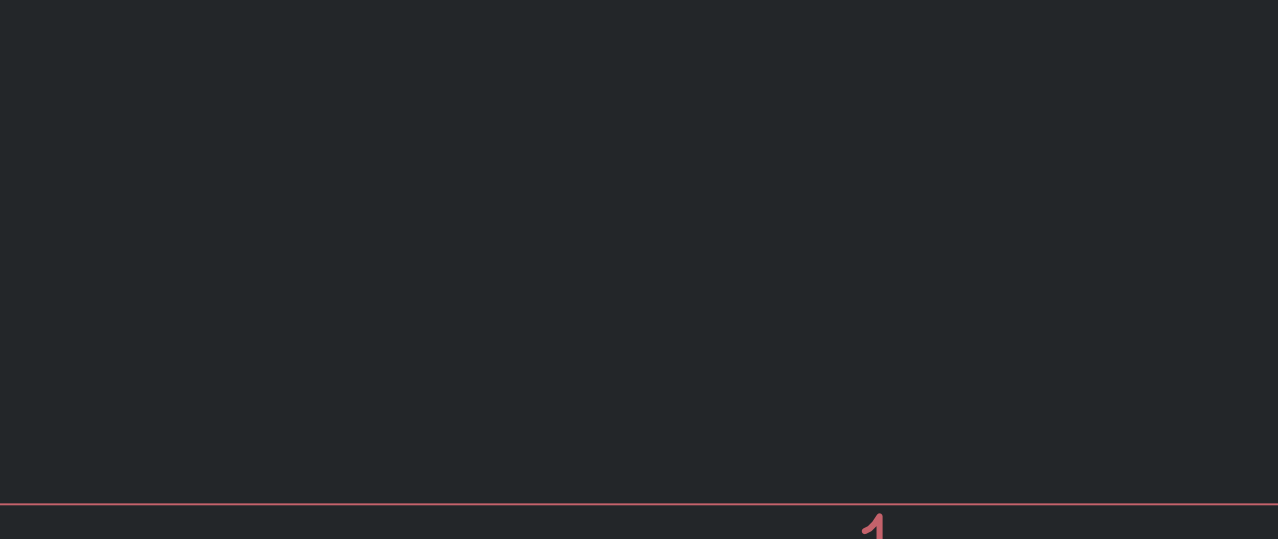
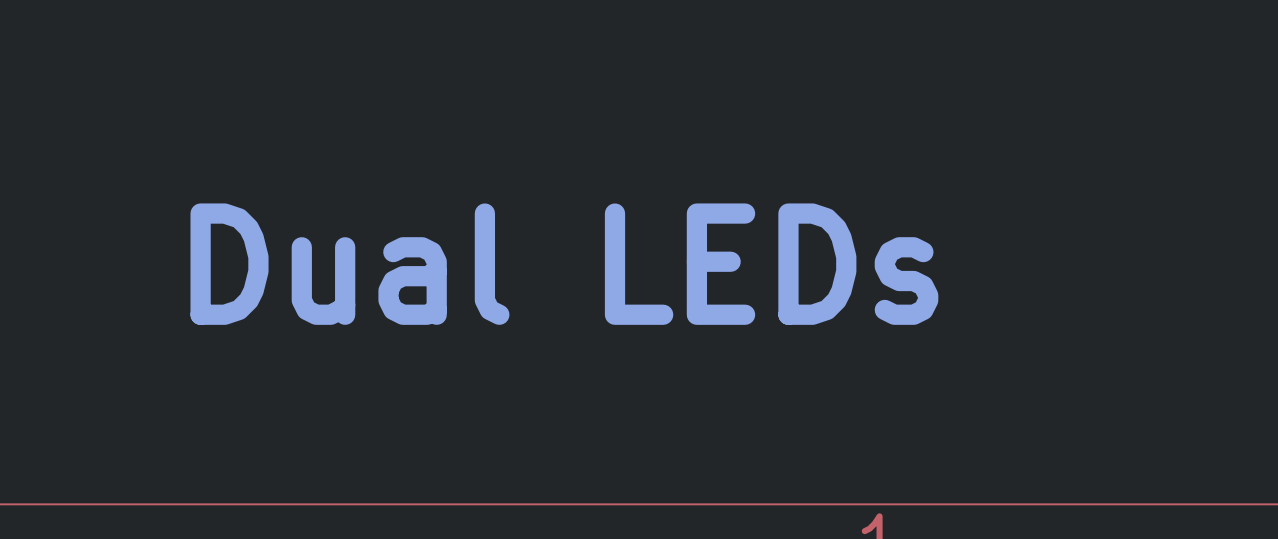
text: none -> Dual LEDs (564, 264)

